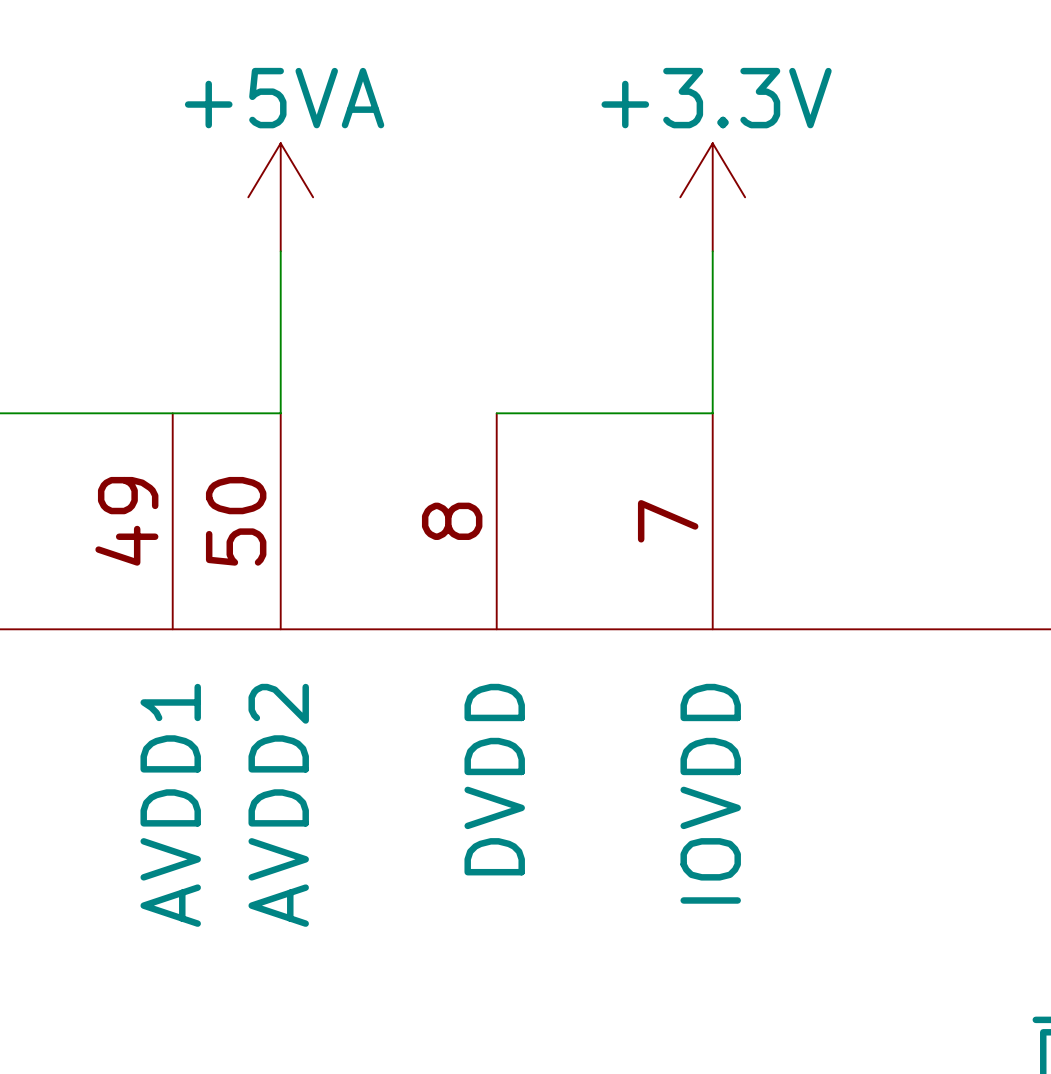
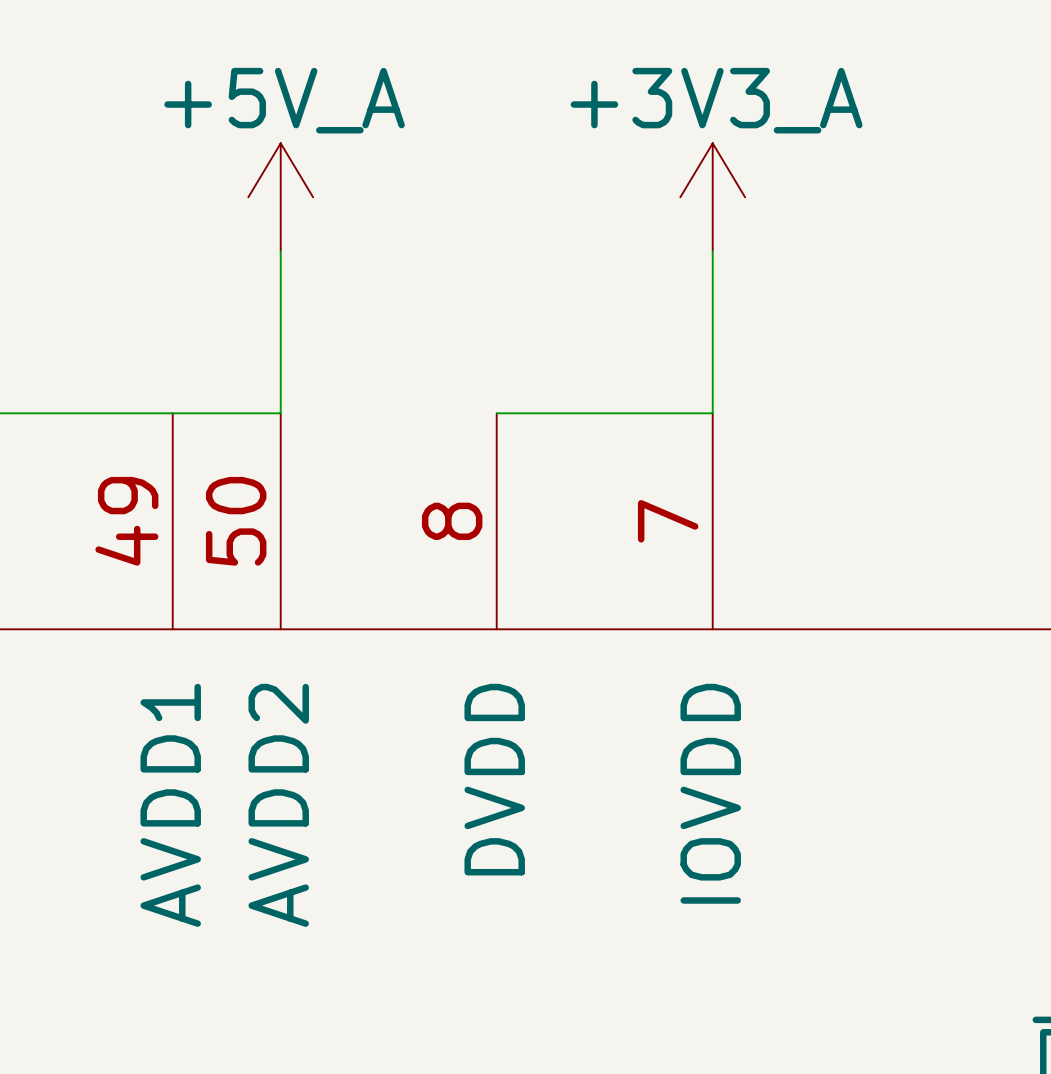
power symbol: +5VA (280, 197) -> +5V_A (280, 197)
power symbol: +3.3V (712, 197) -> +3V3_A (712, 197)

